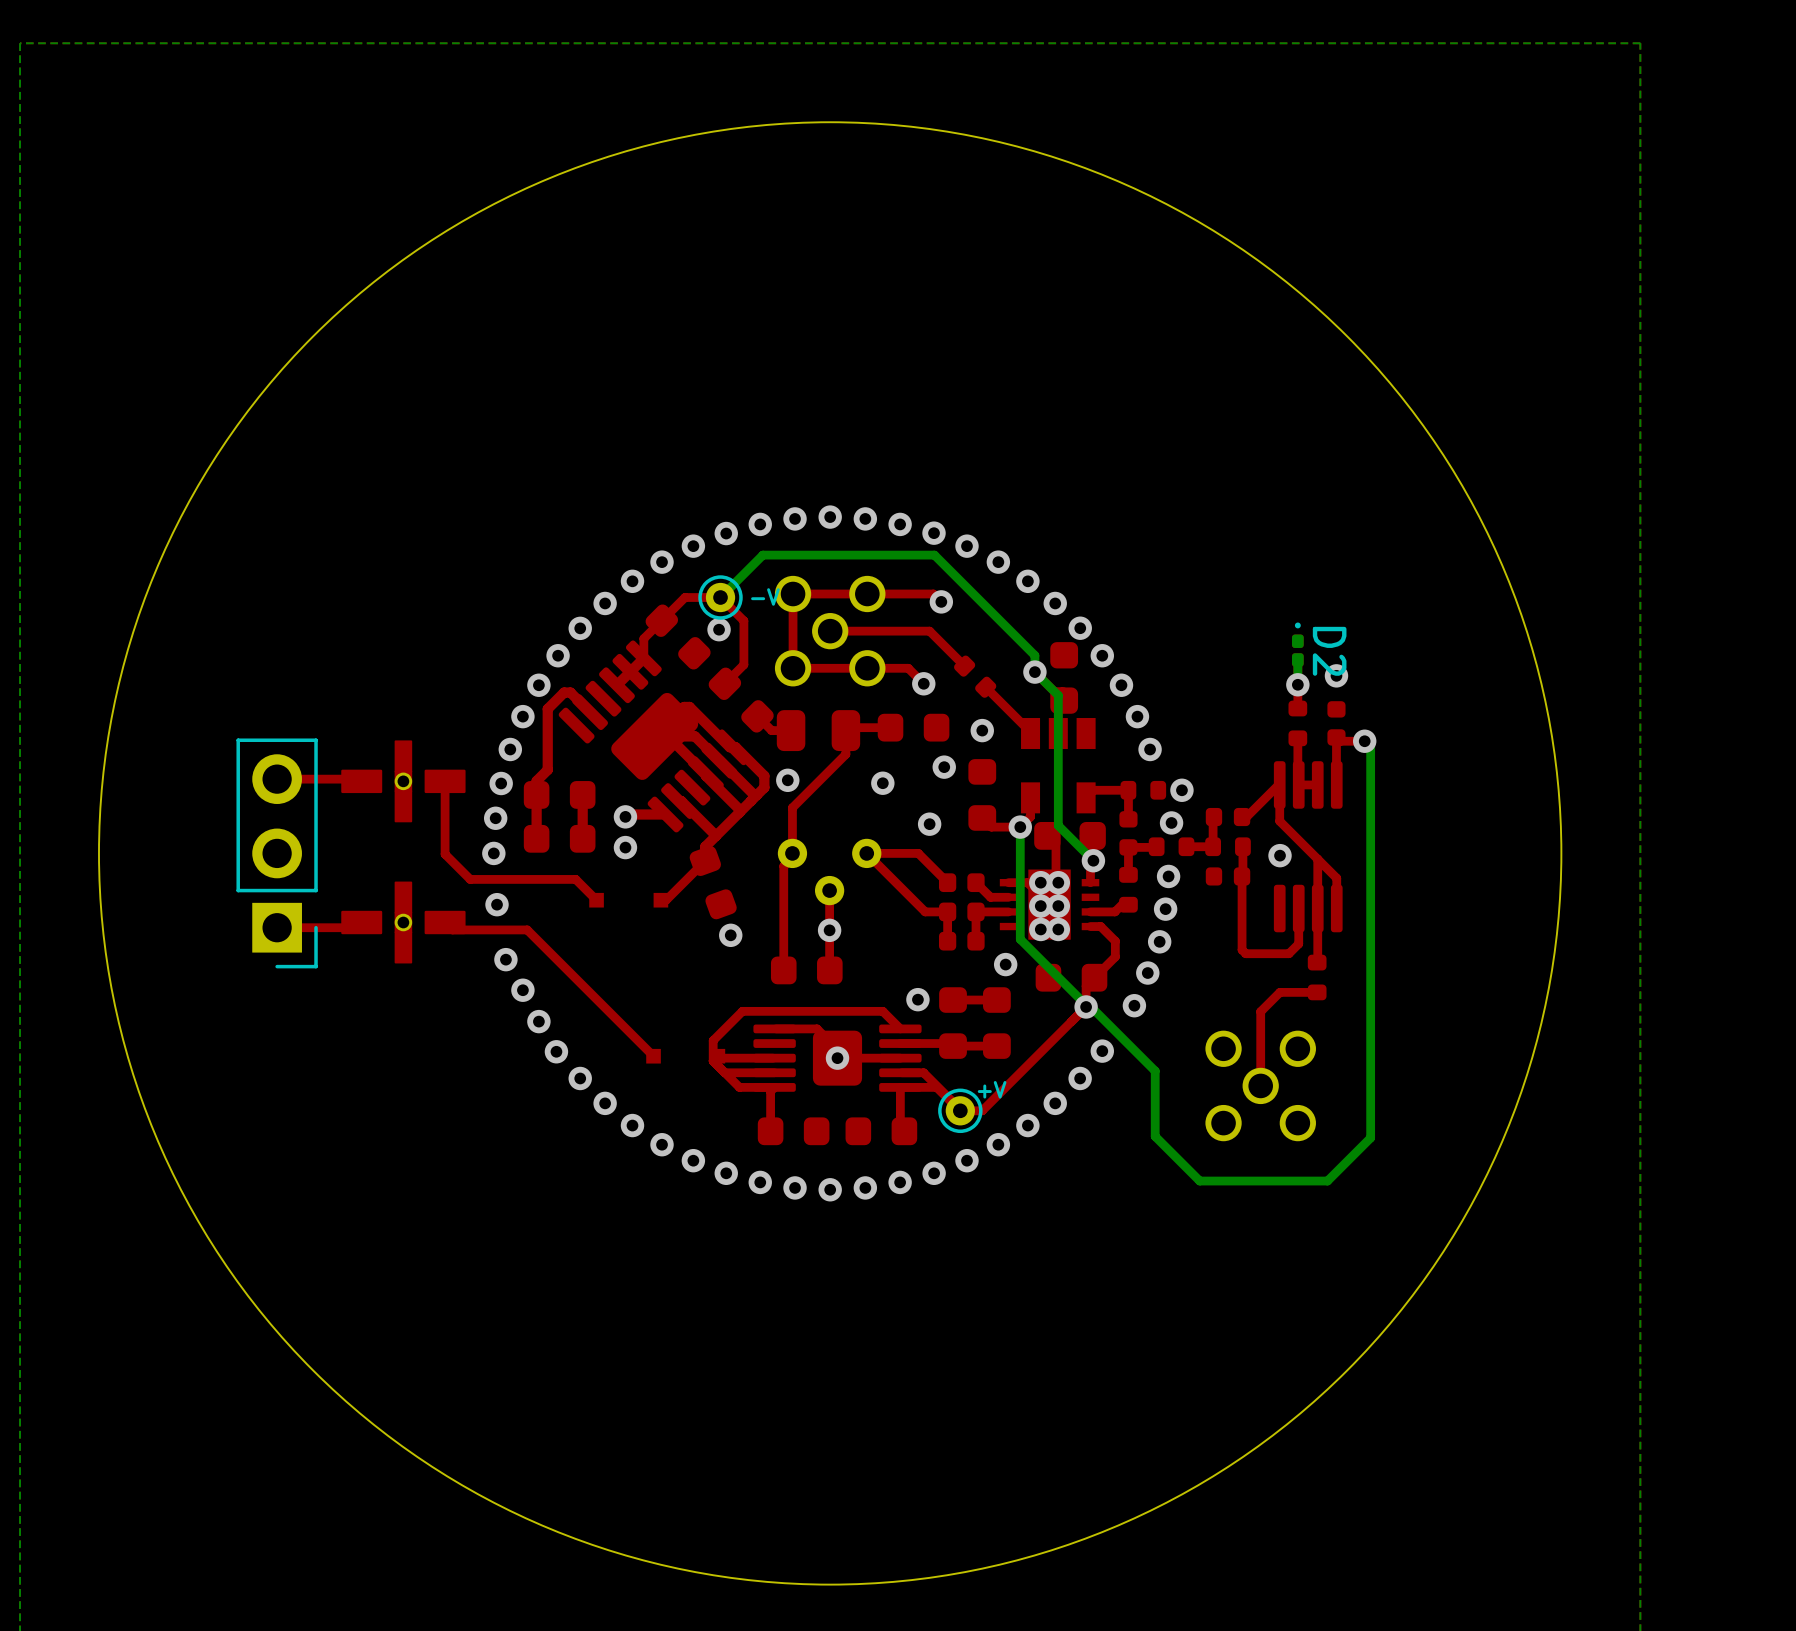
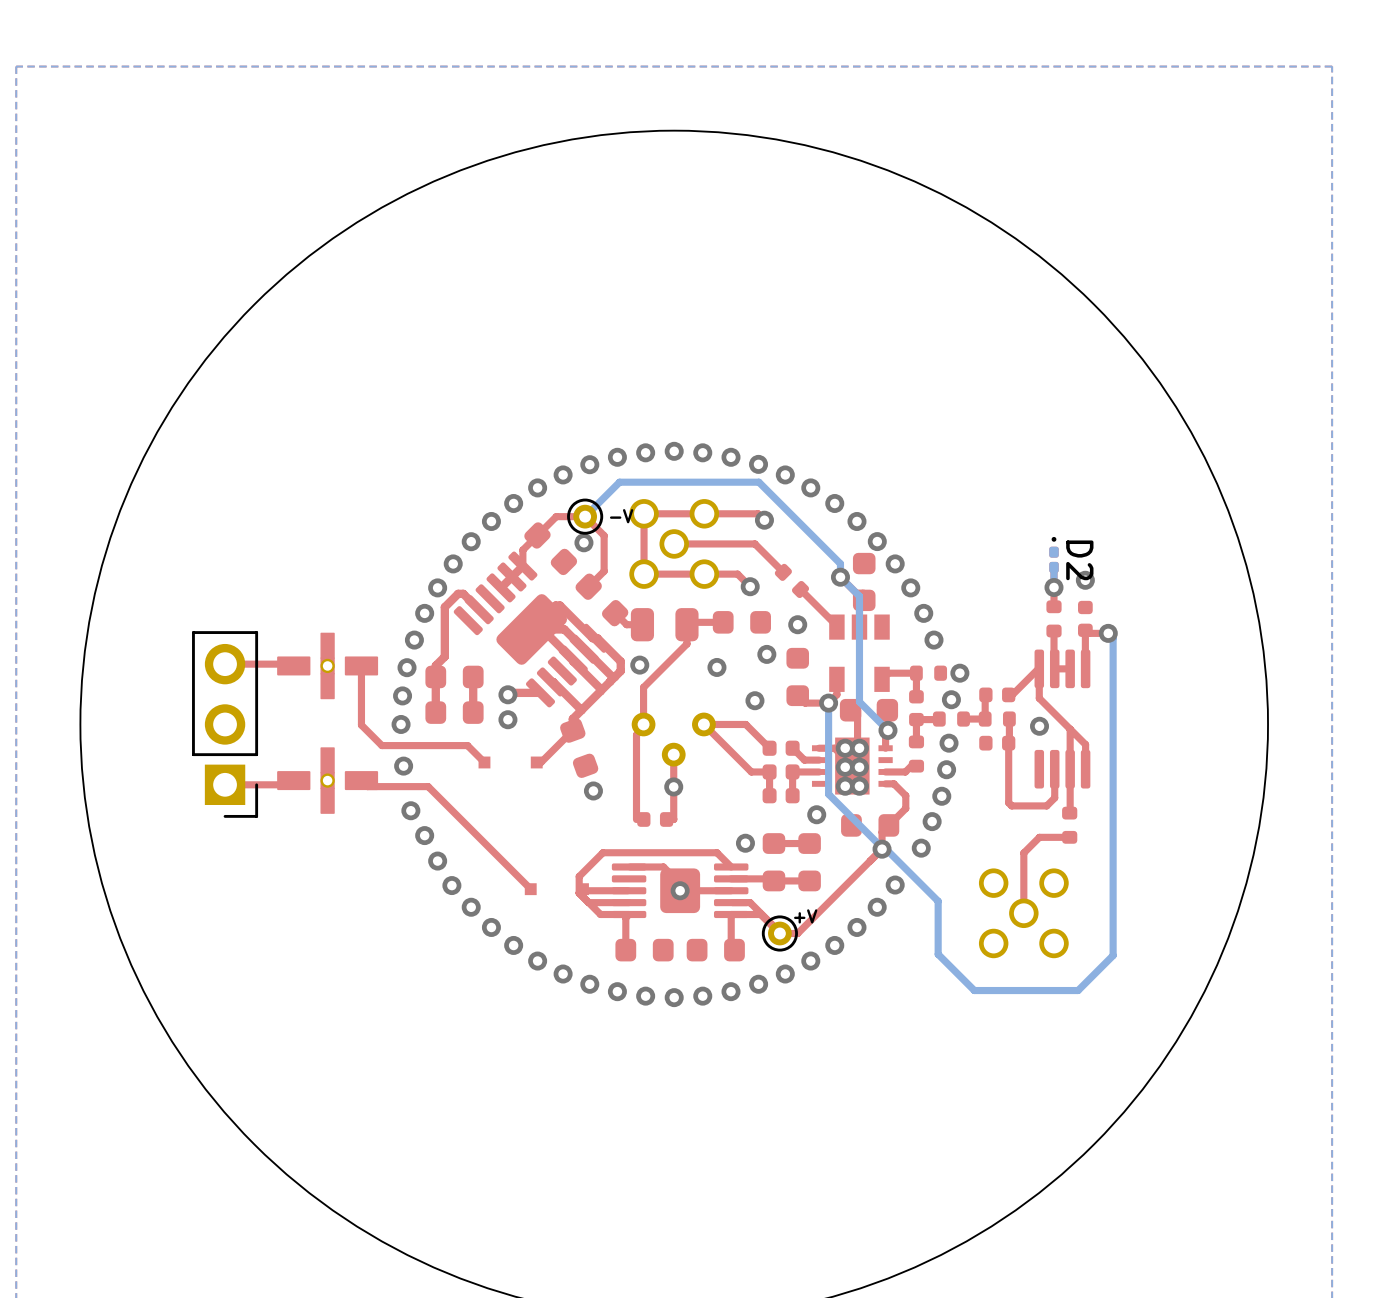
part footprint: [770, 956, 843, 985] -> [637, 812, 674, 827]

